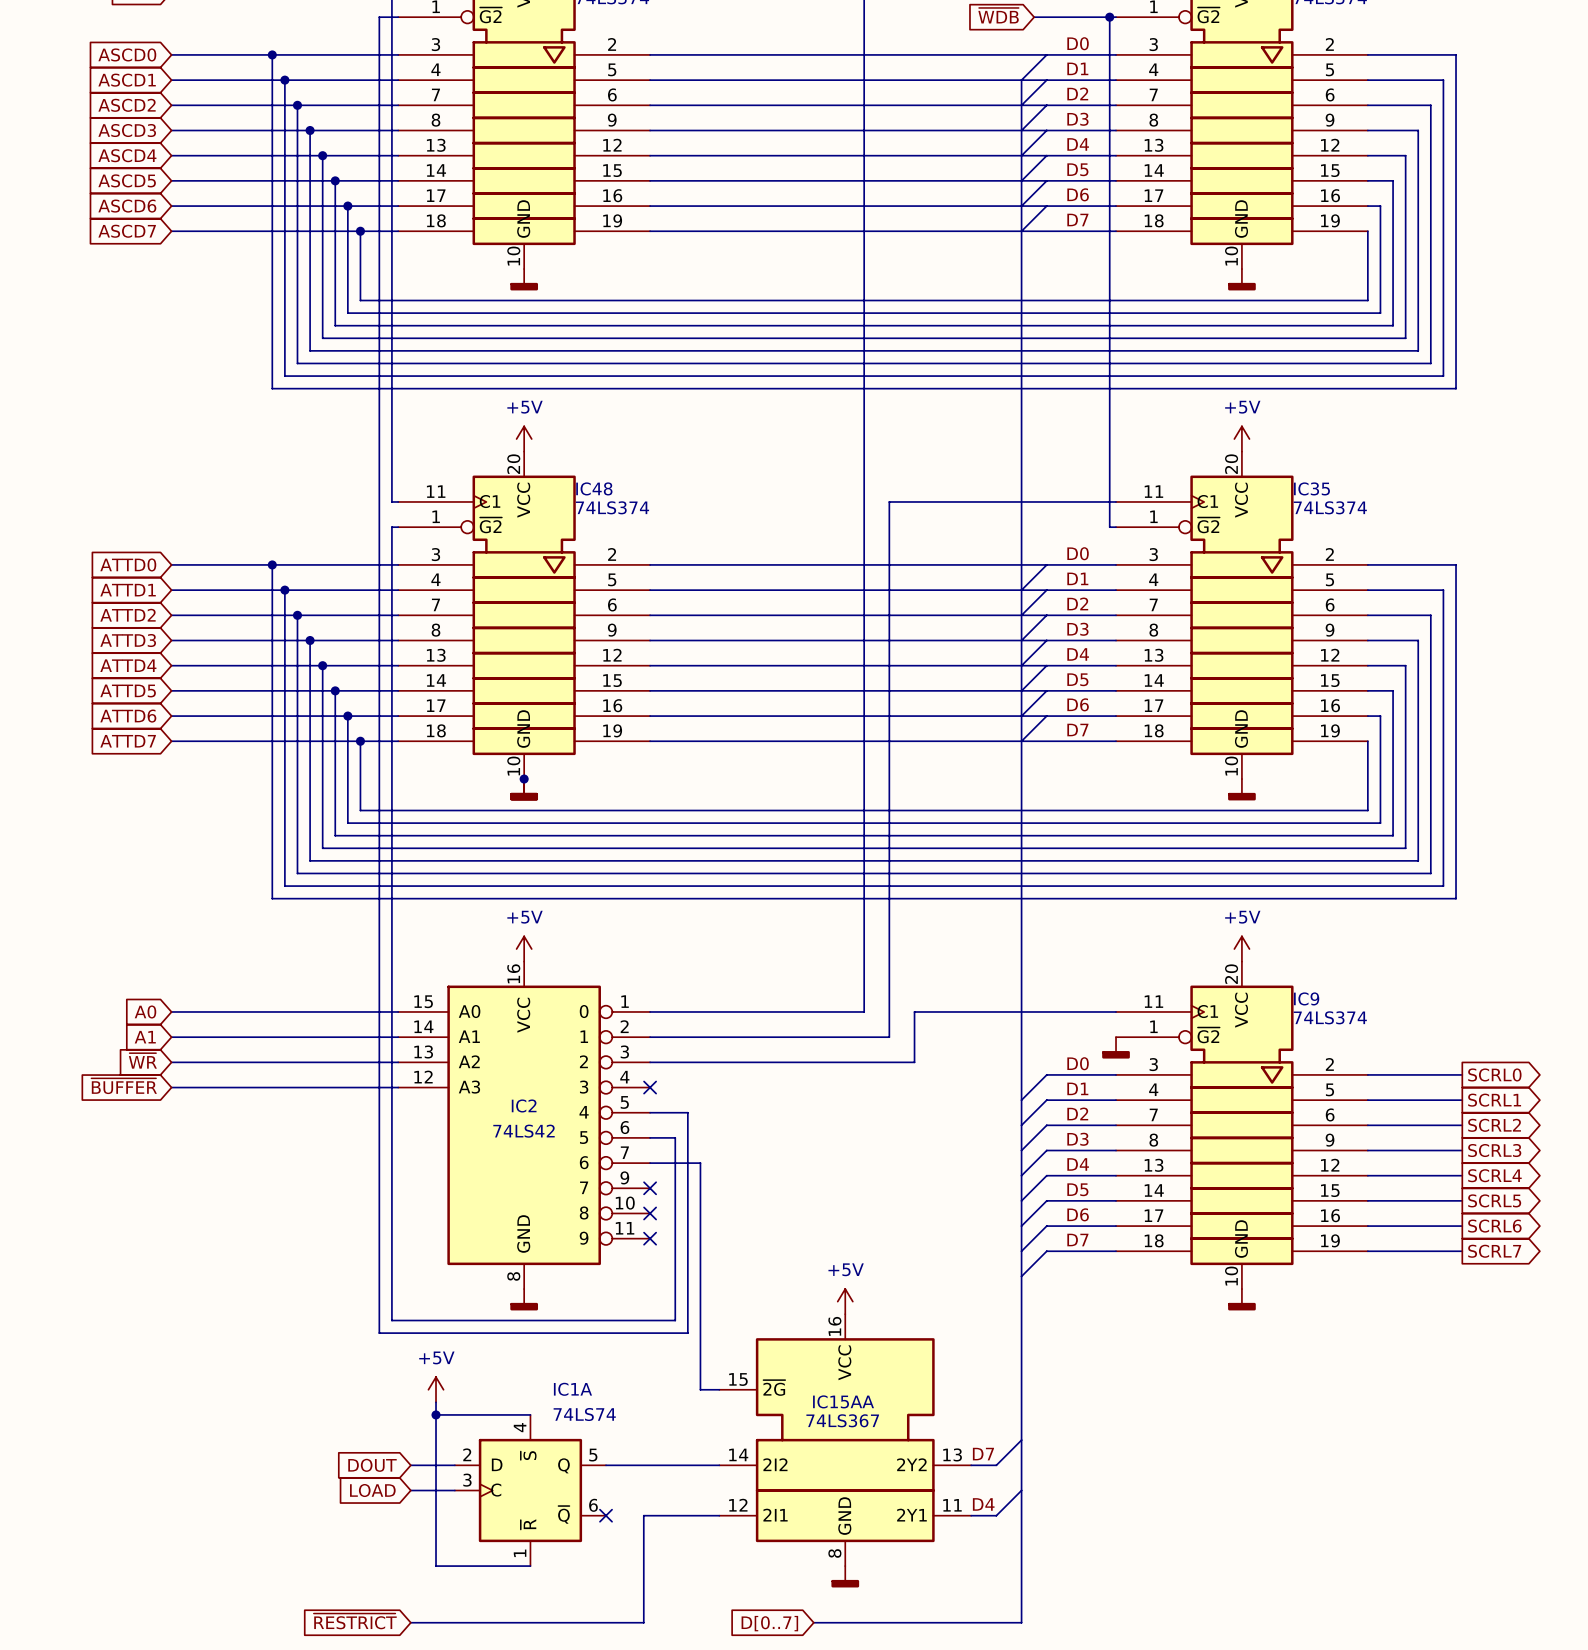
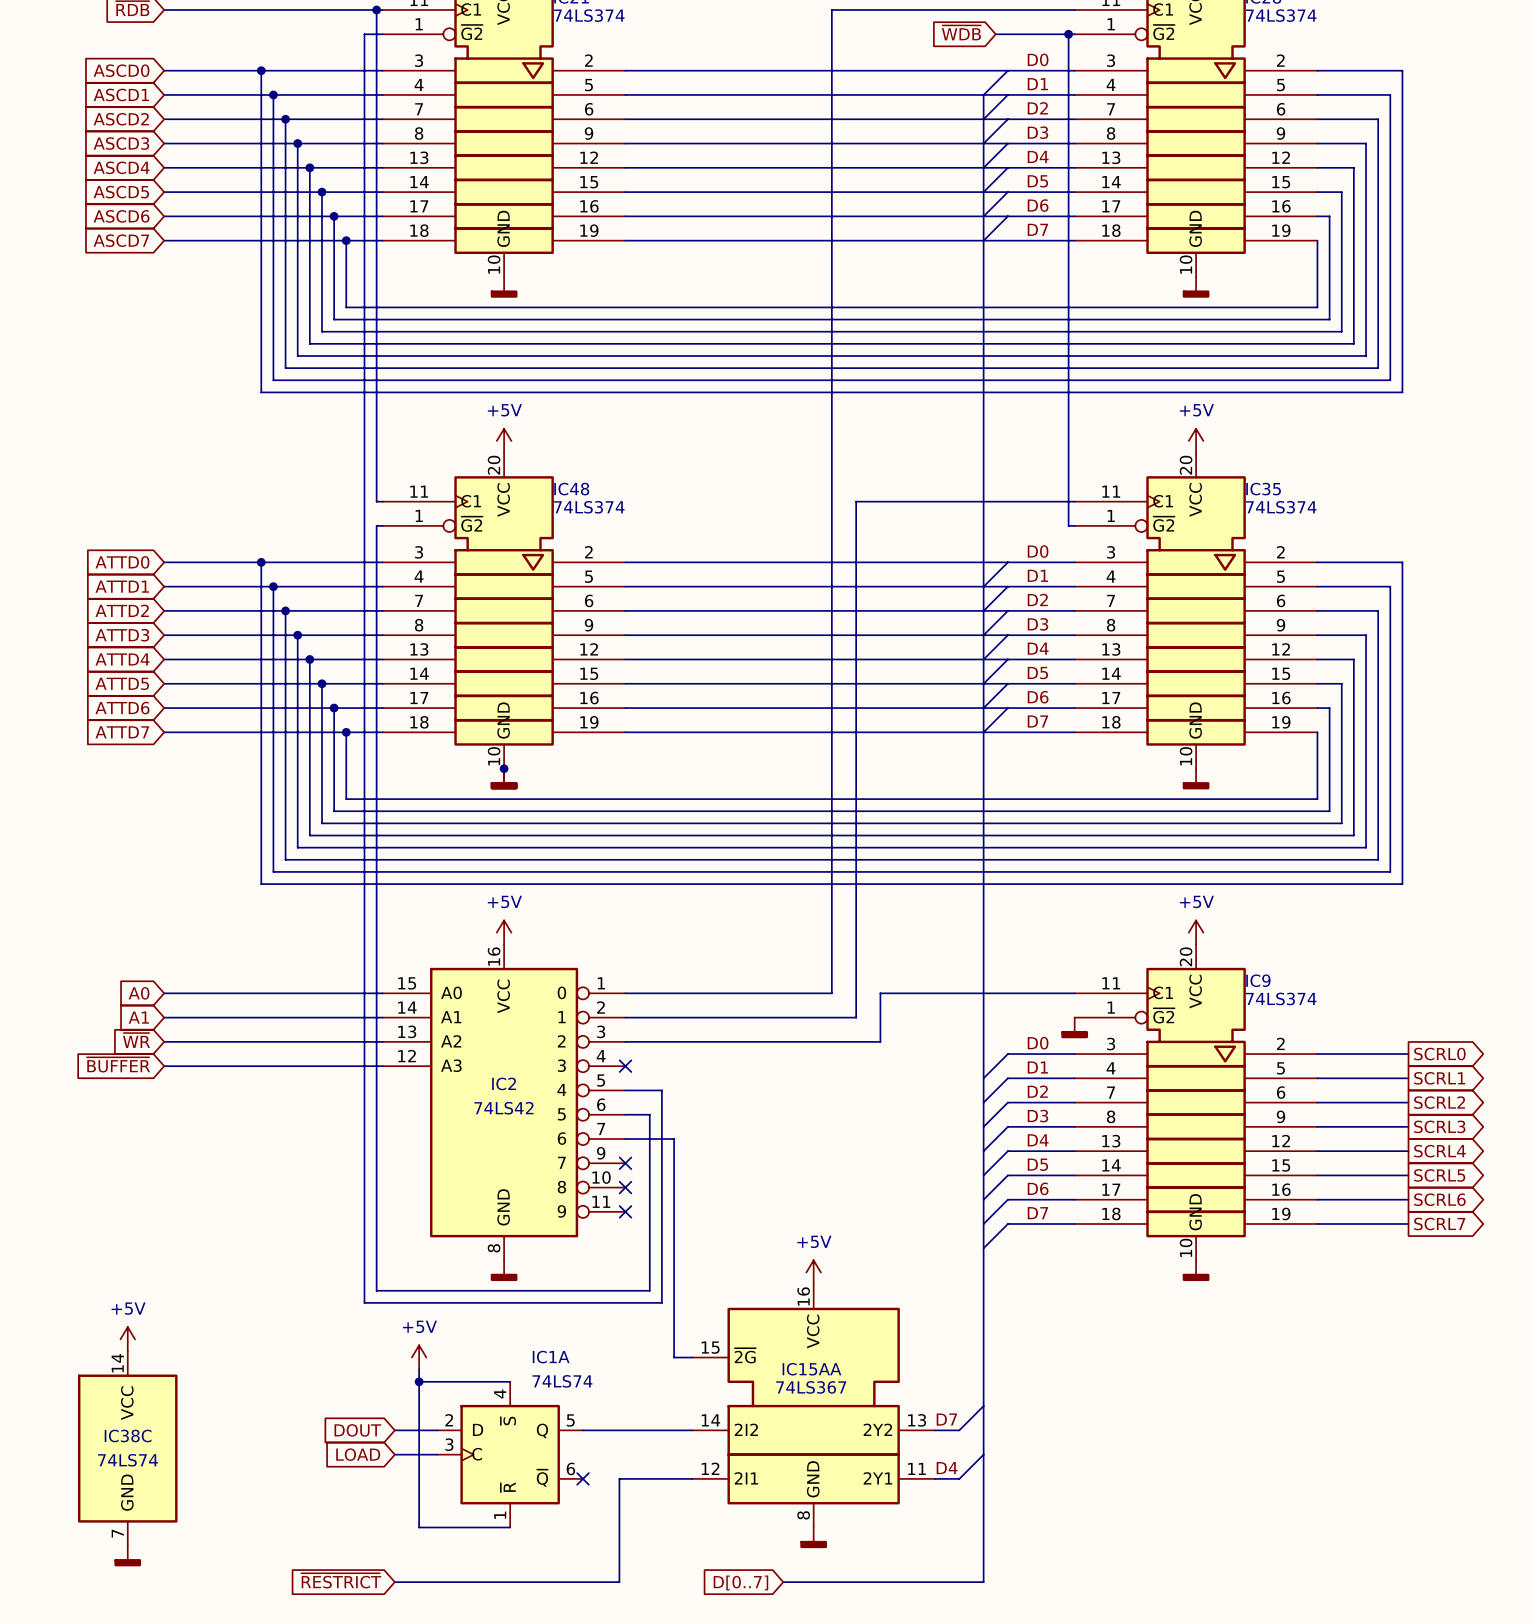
power symbol: none -> +5V (127, 1339)
IC38C: none -> 74LS74 (127, 1448)
power symbol: none -> (127, 1556)

